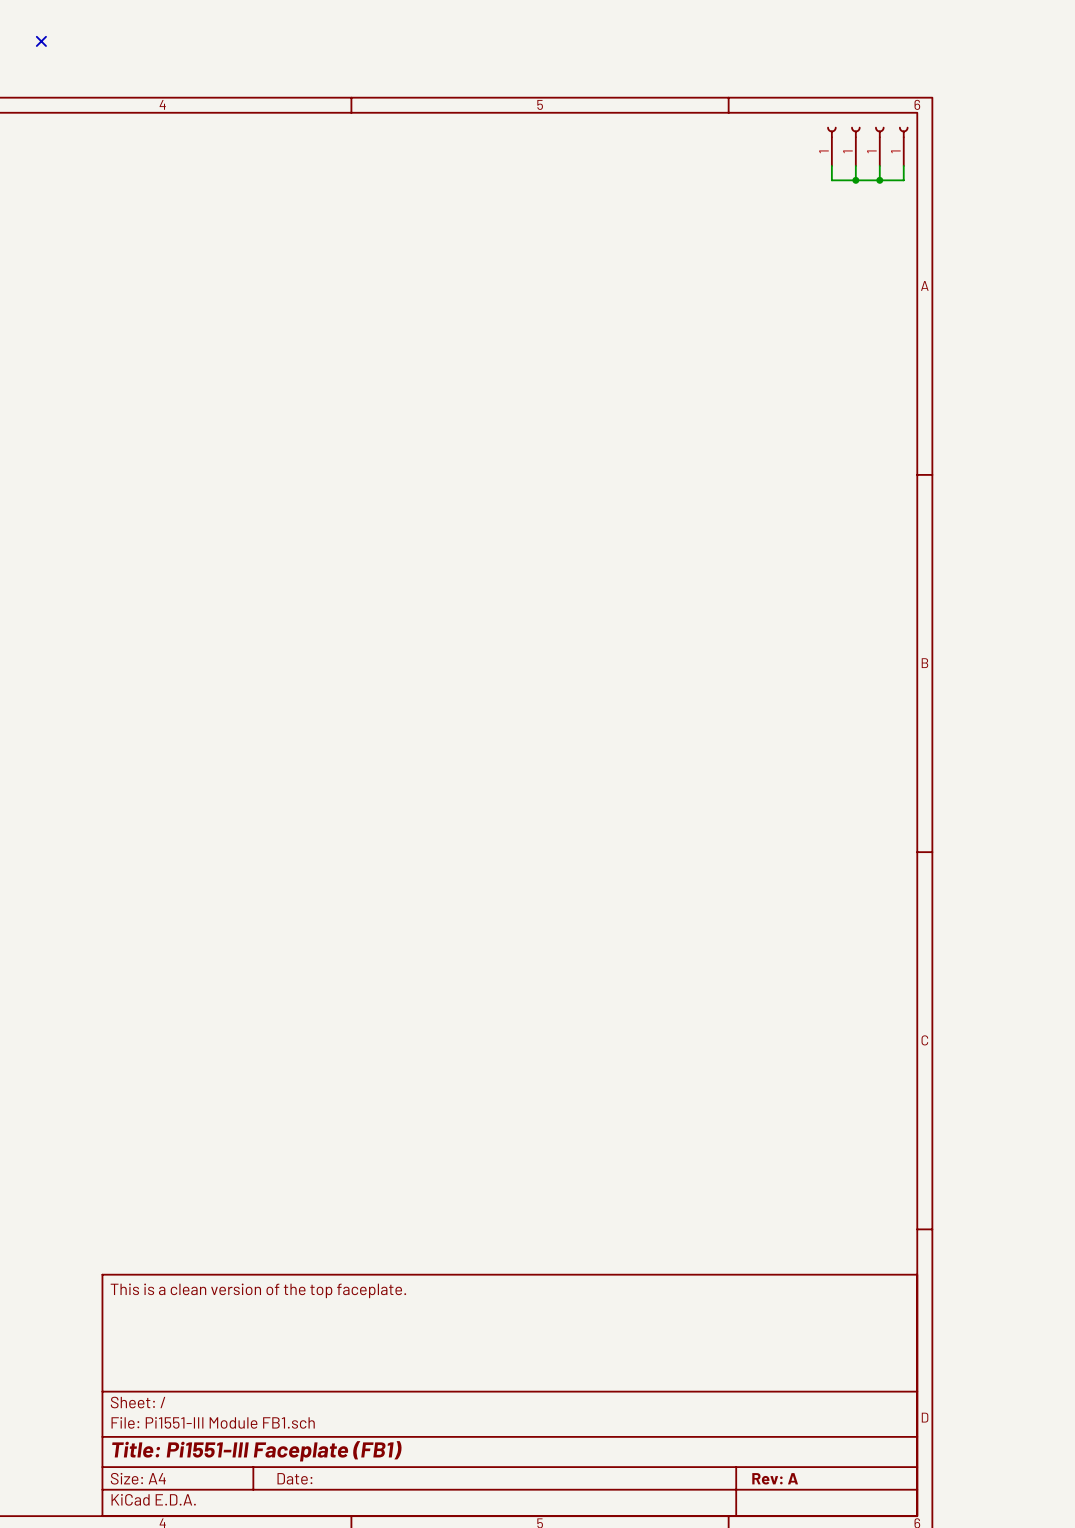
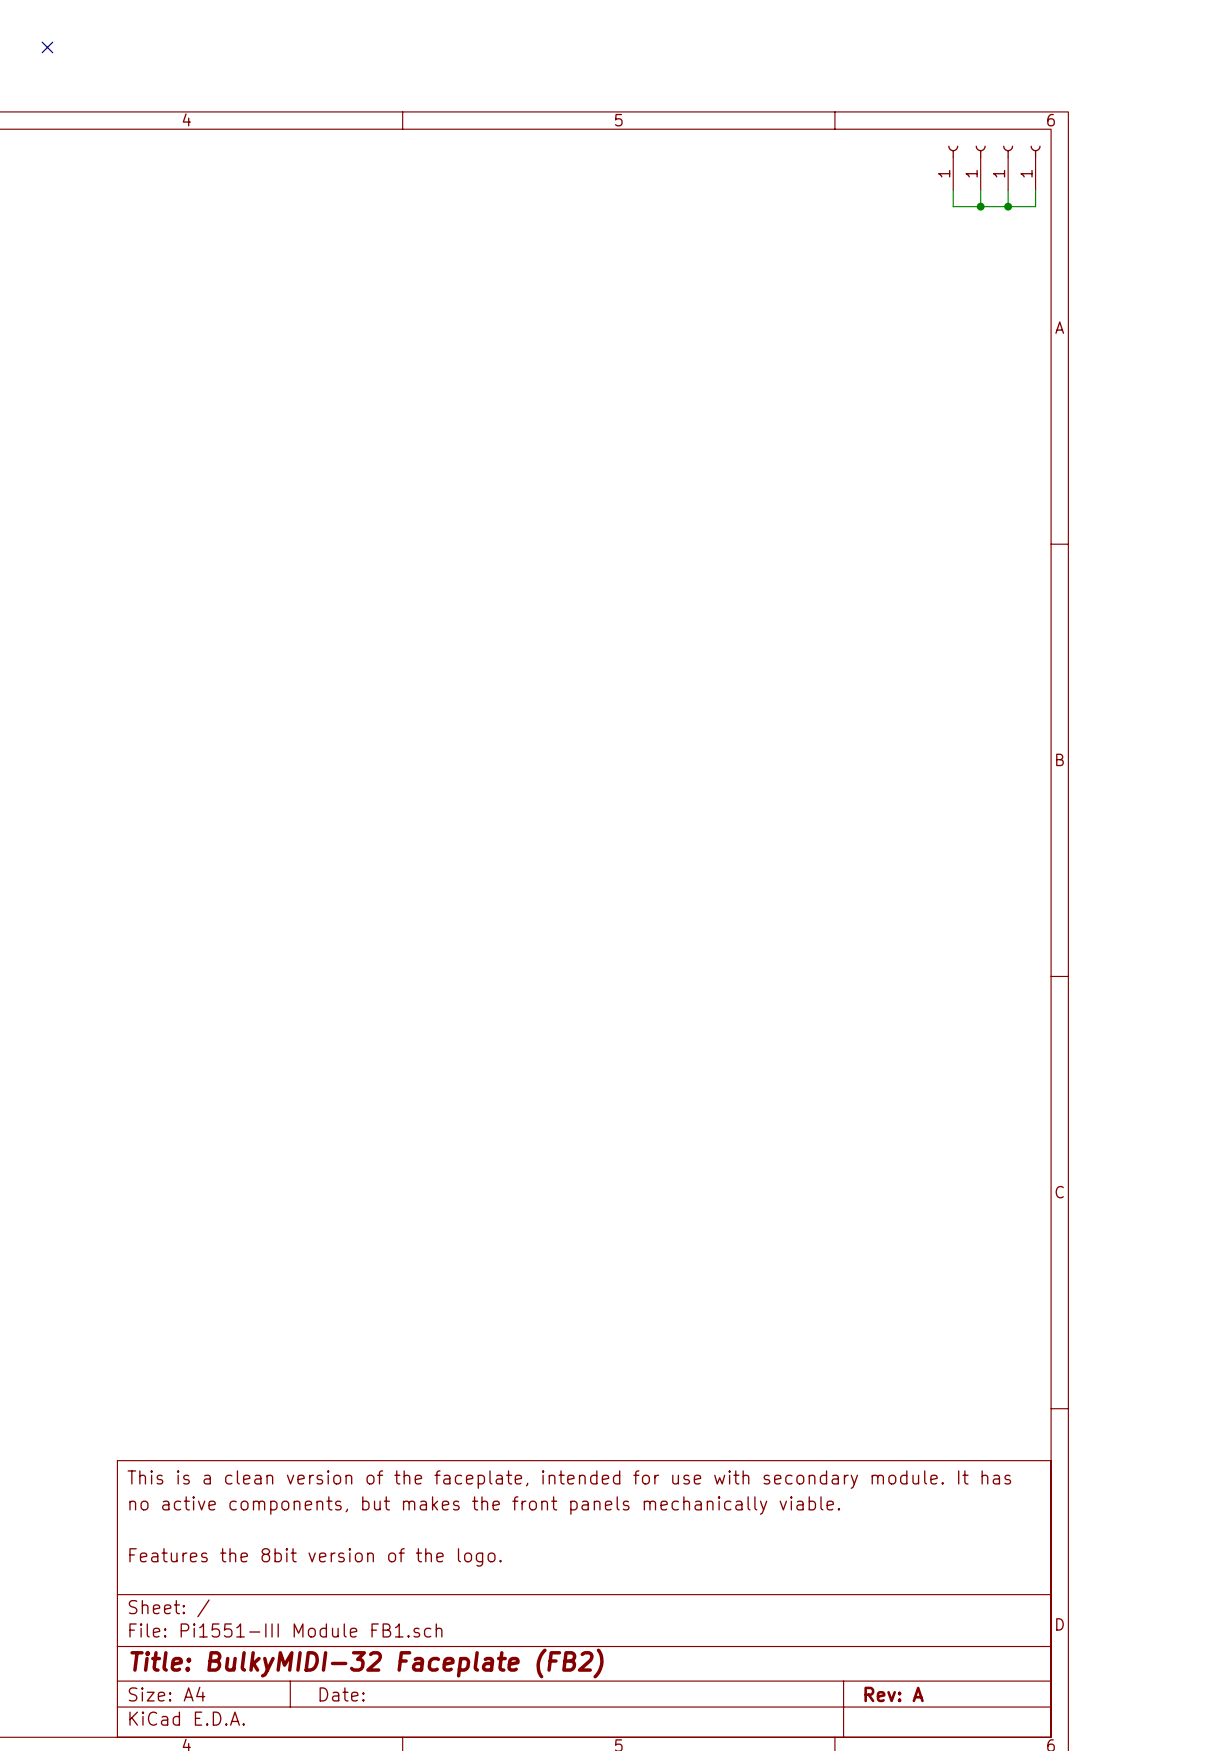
title block: This is a clean version of the top faceplate. (258, 1290) -> This is a clean version of the faceplate, intended for use with secondary module. It has (569, 1479)
title block: none -> no active components, but makes the front panels mechanically viable. (484, 1505)
title block: none -> Features the 8bit version of the logo. (315, 1557)
title block: Title: Pi1551-III Faceplate (FB1) (256, 1451) -> Title: BulkyMIDI-32 Faceplate (FB2) (367, 1663)

